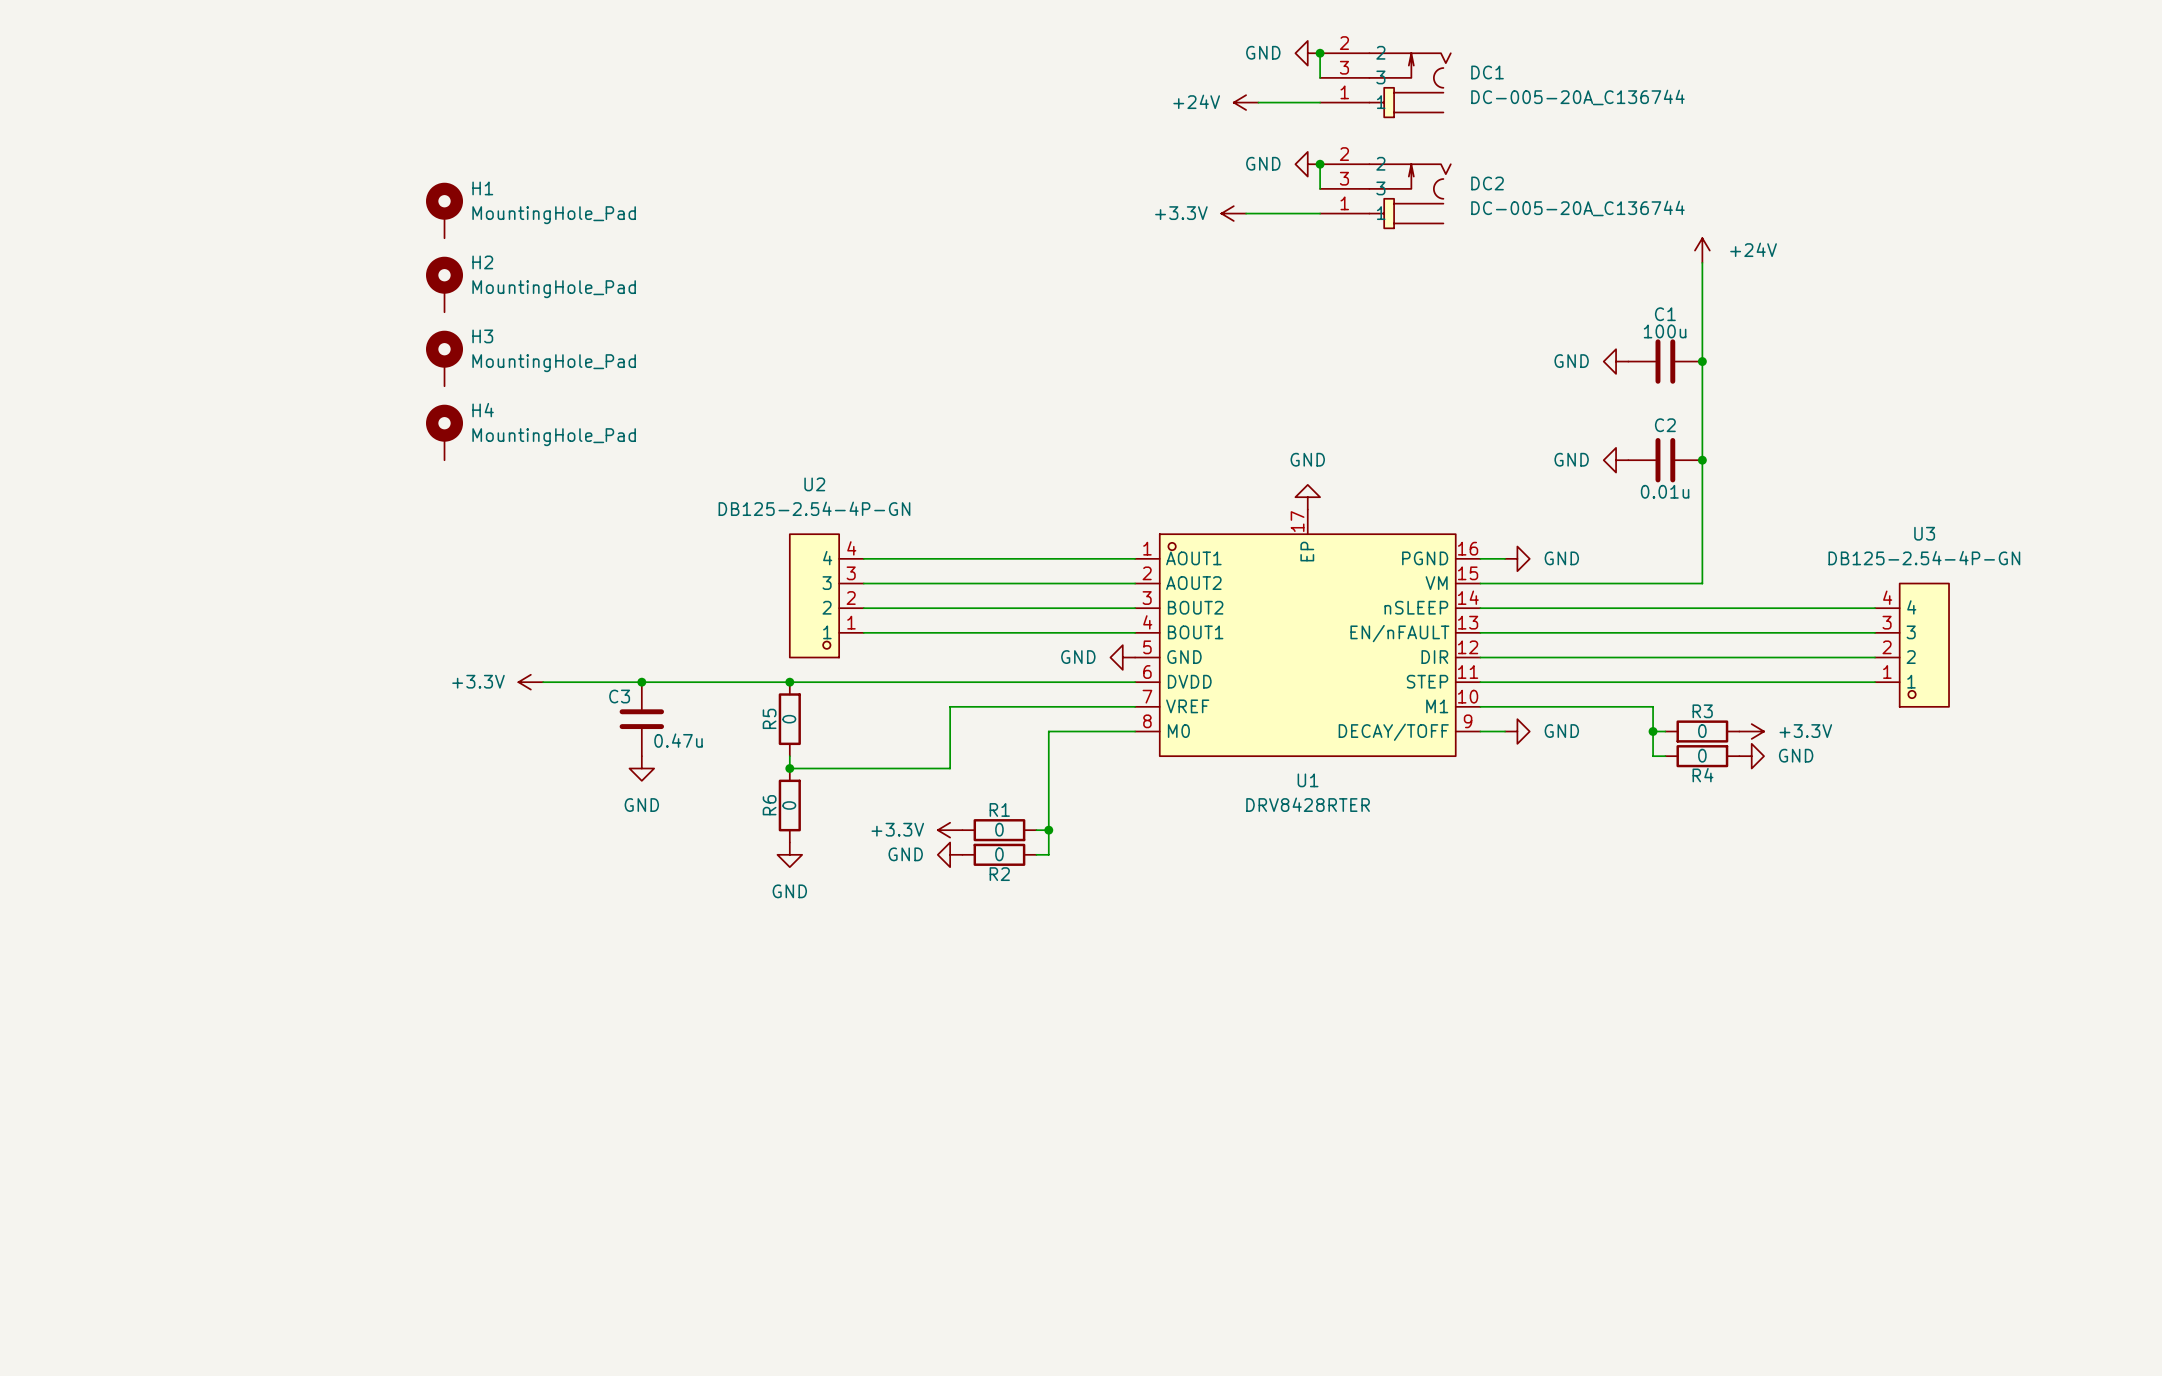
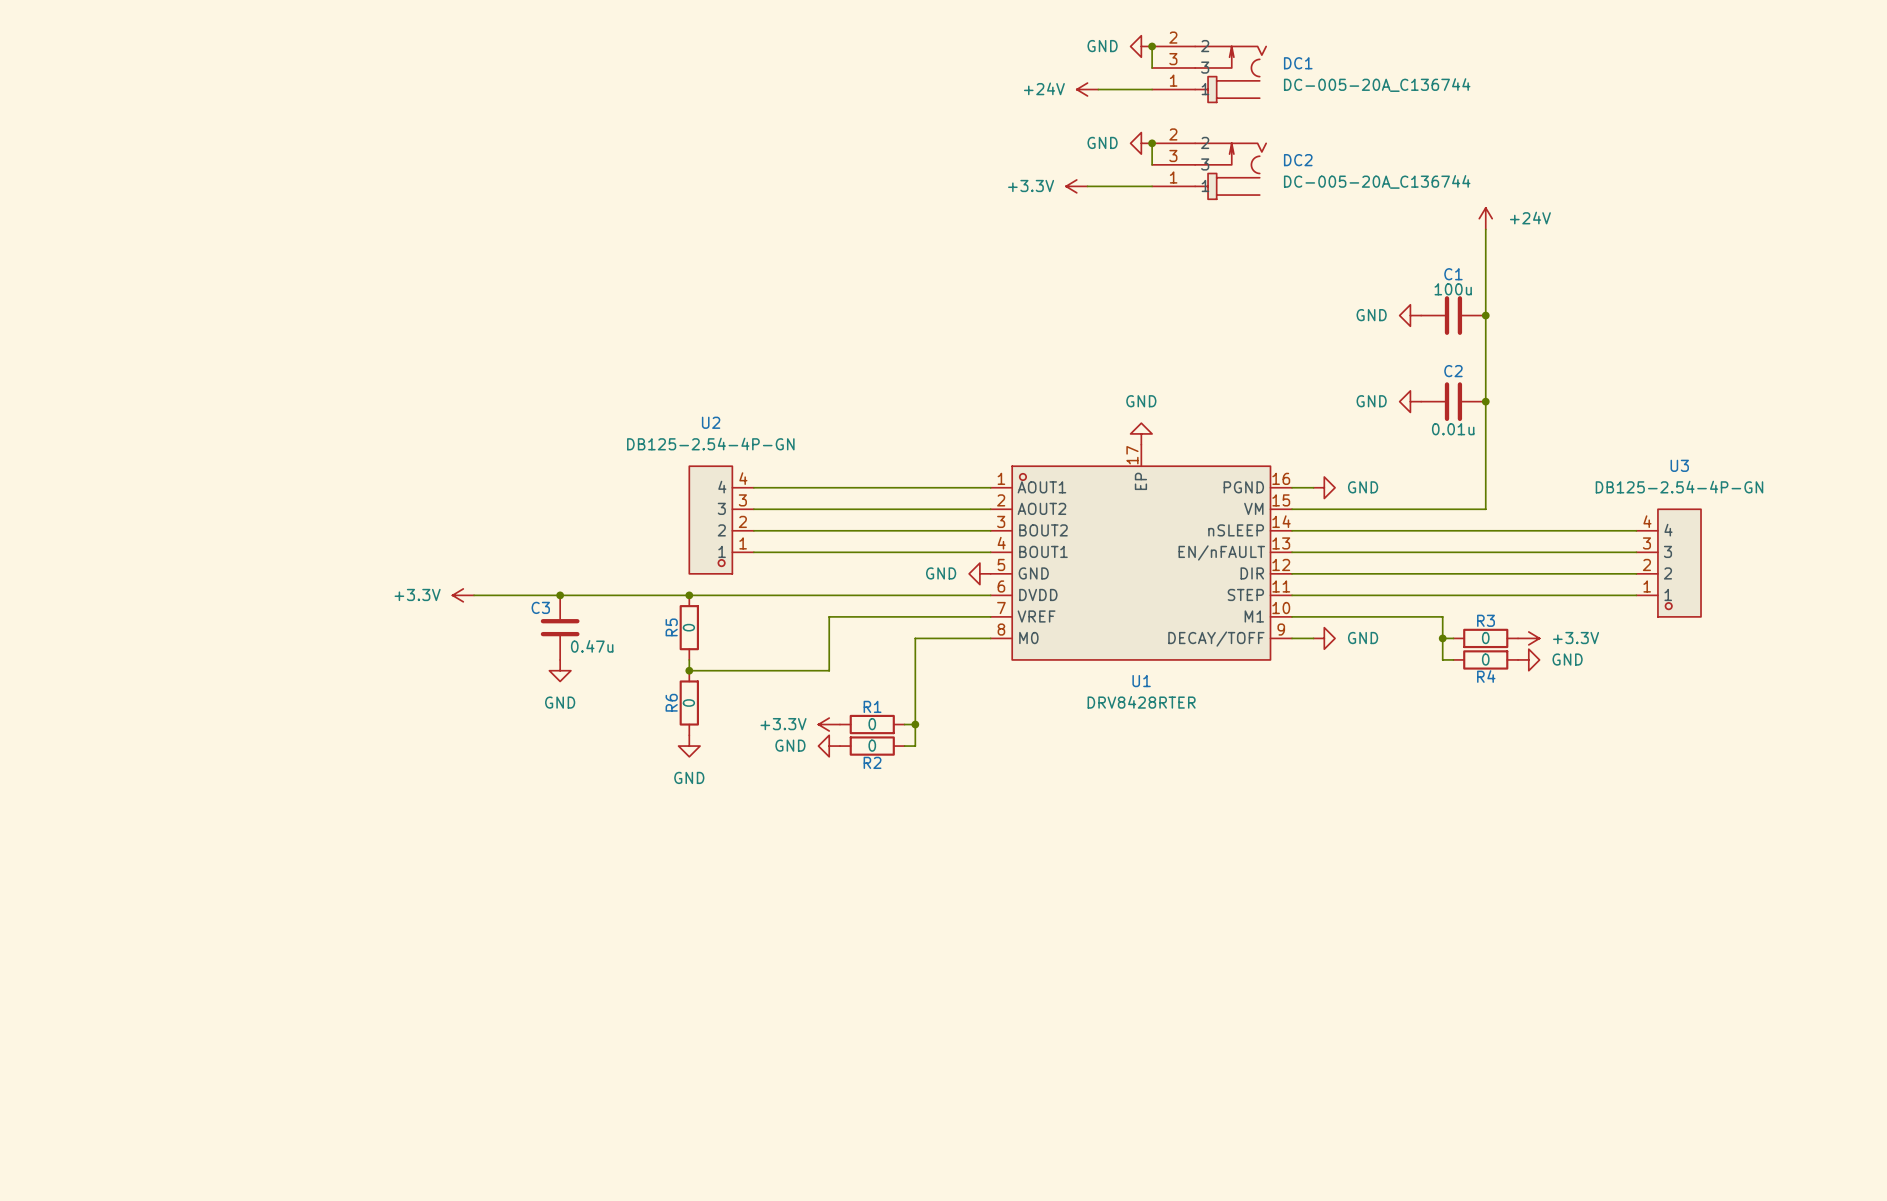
H1: MountingHole_Pad (444, 210) -> none
H2: MountingHole_Pad (444, 284) -> none
H3: MountingHole_Pad (444, 358) -> none
H4: MountingHole_Pad (444, 432) -> none

